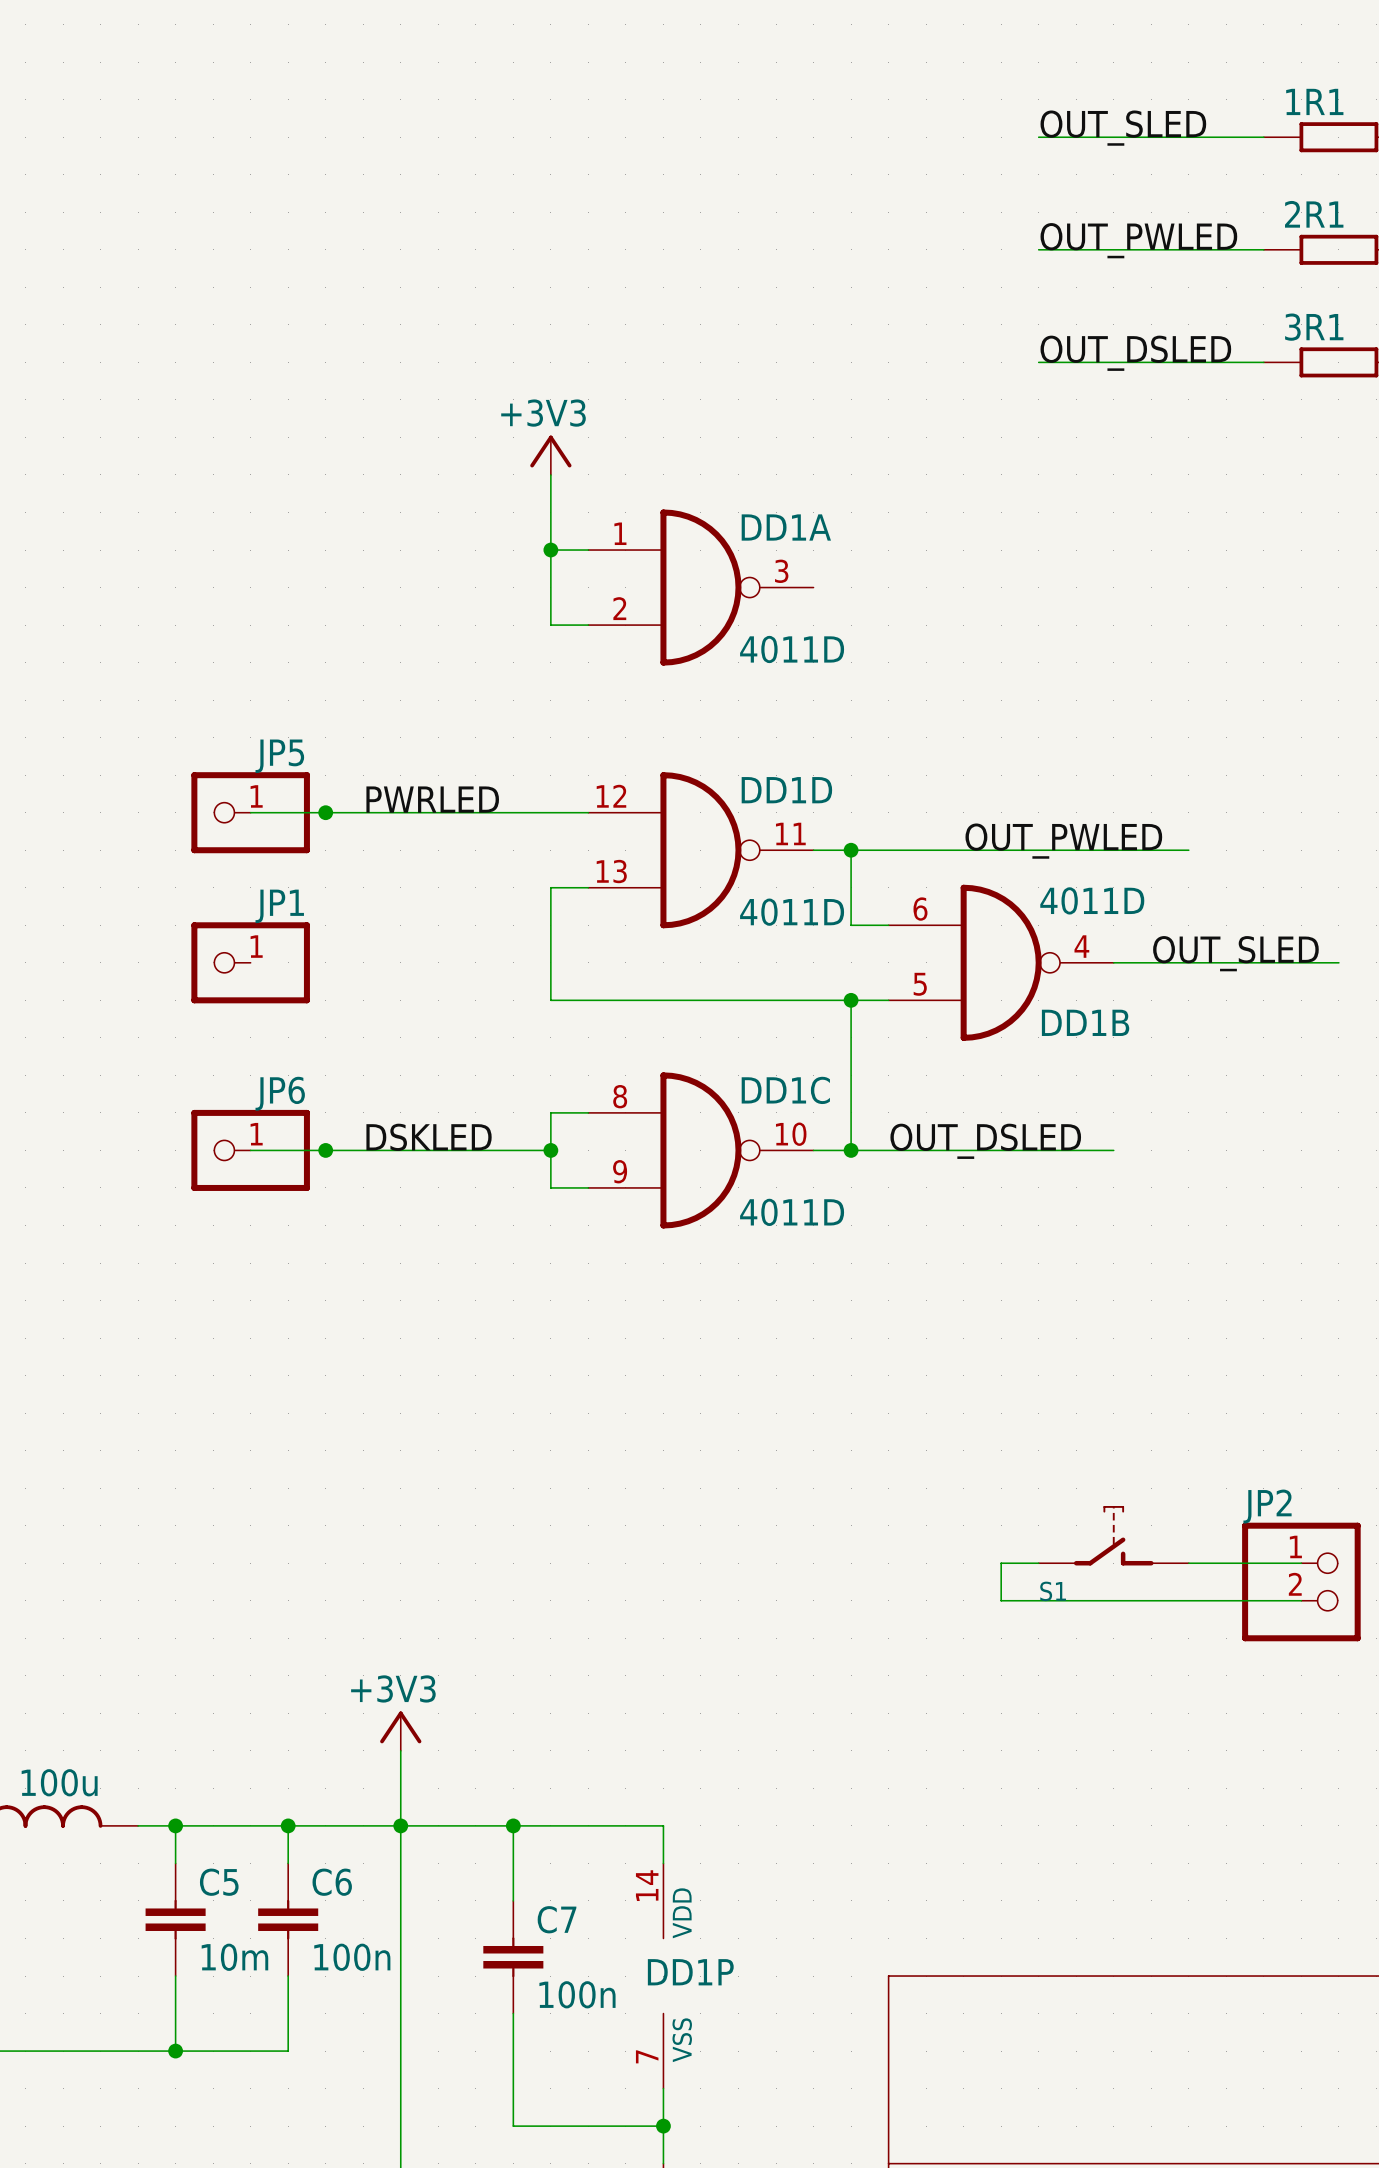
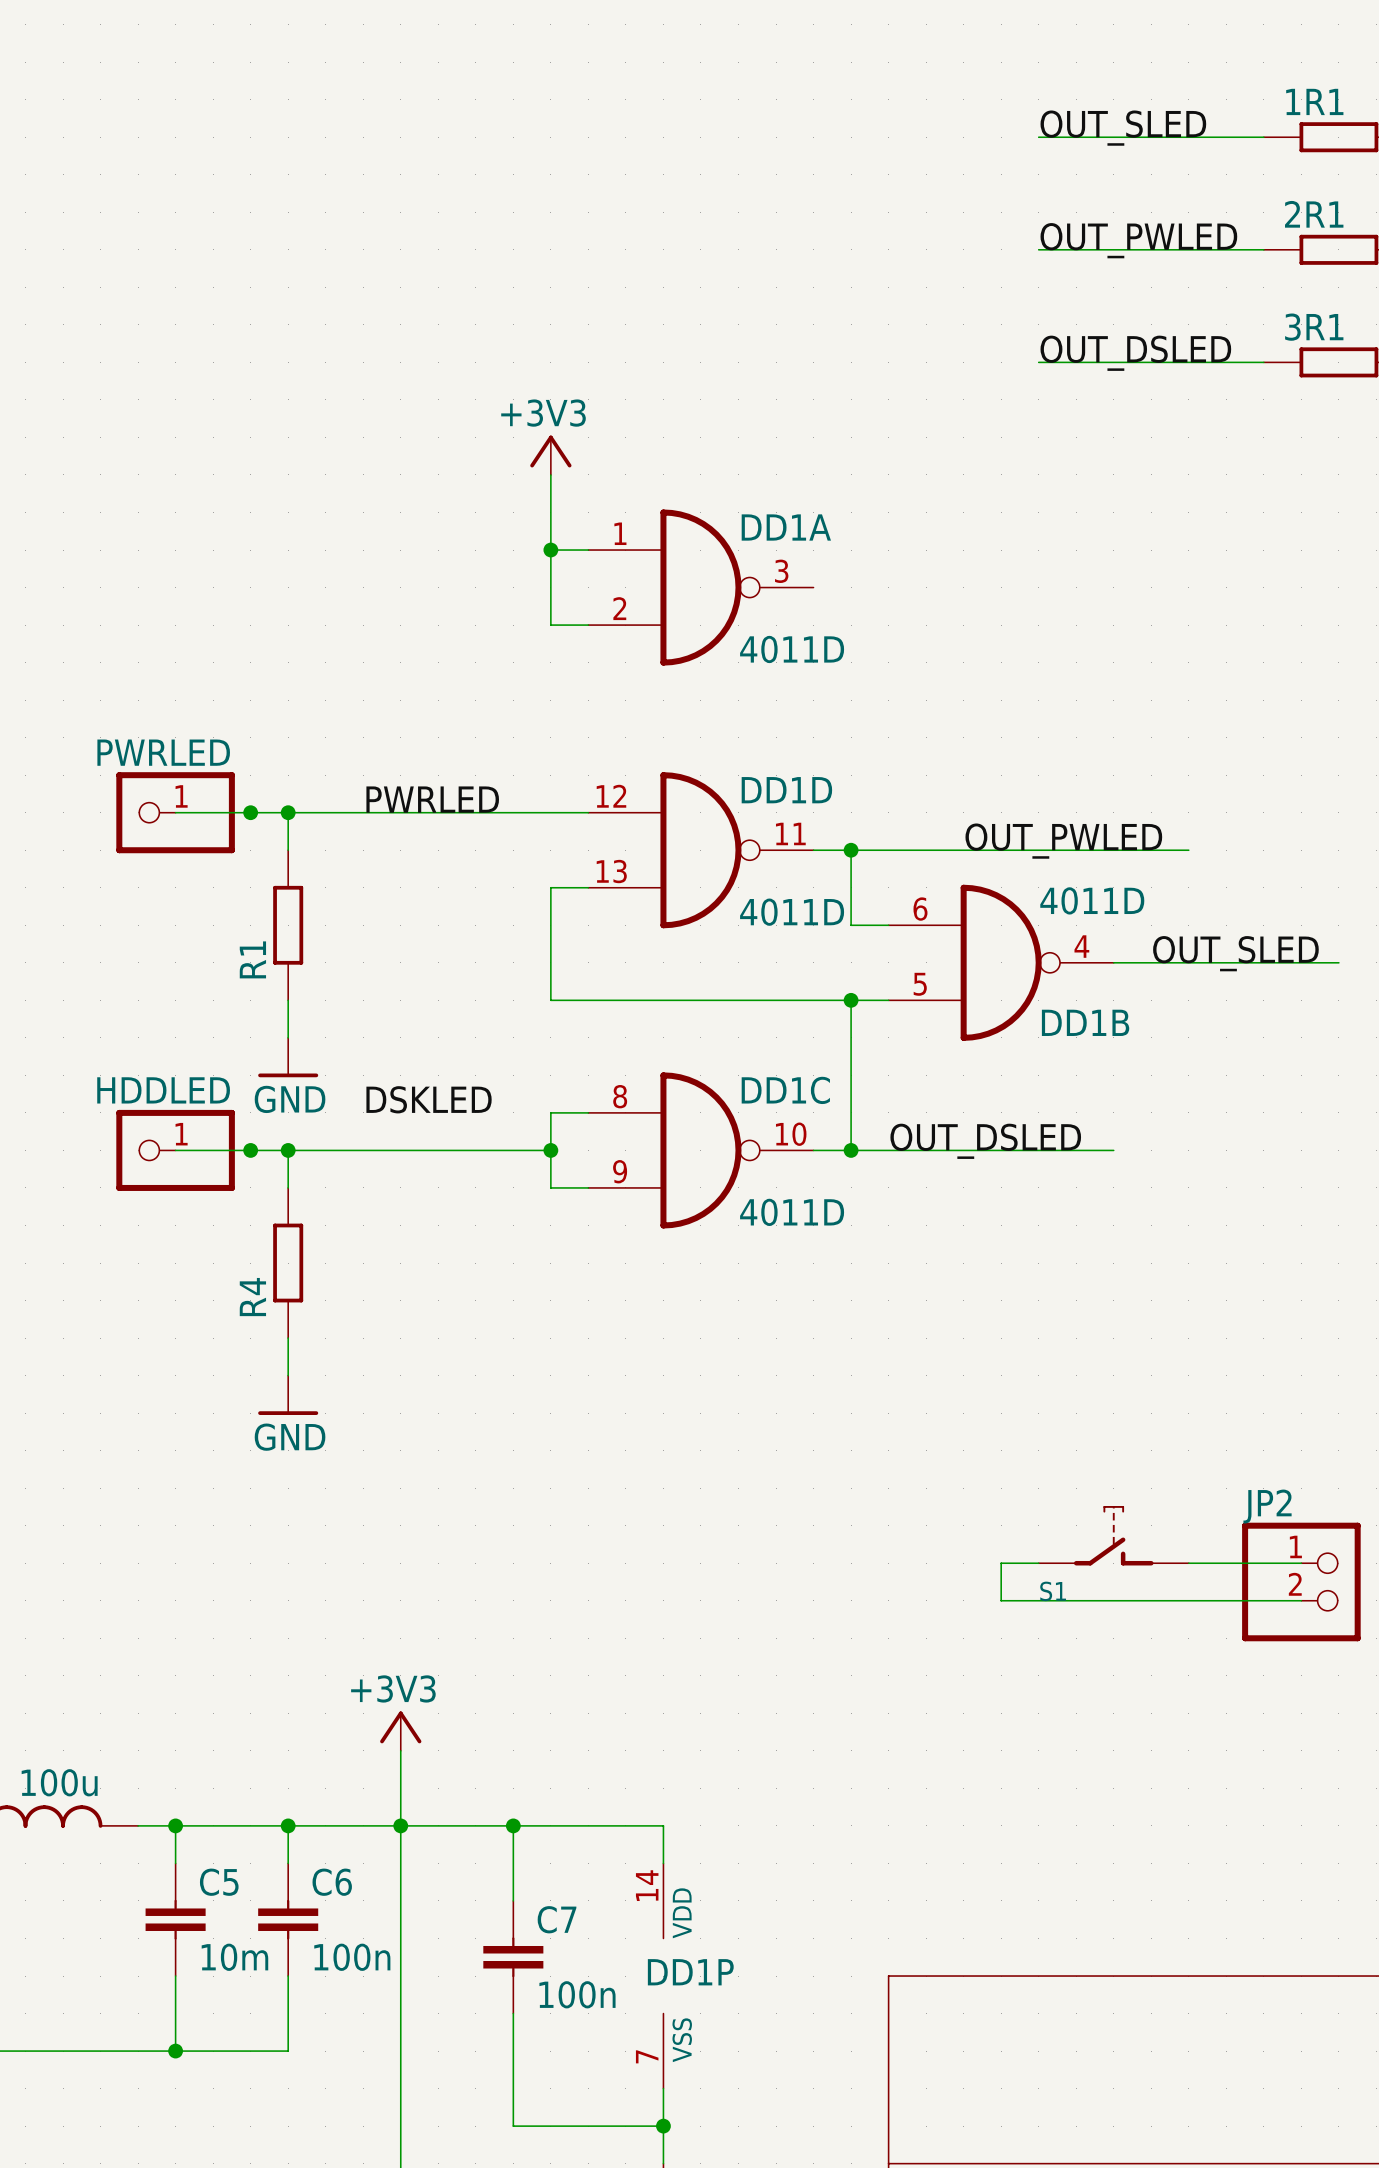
wire: none -> (175, 812) (250, 812)
PWRLED: none -> (175, 812)
JP5: (250, 812) -> none
junction: none -> (250, 812)
wire: none -> (288, 812) (288, 850)
junction: none -> (288, 812)
junction: (325, 812) -> none
R1: none -> (288, 925)
JP1: (250, 962) -> none
wire: none -> (288, 1000) (288, 1037)
power symbol: none -> GND (288, 1057)
label position: DSKLED (429, 1137) -> DSKLED (429, 1099)
wire: none -> (175, 1150) (250, 1150)
HDDLED: none -> (175, 1150)
JP6: (250, 1150) -> none
junction: none -> (250, 1150)
wire: none -> (288, 1150) (288, 1187)
junction: none -> (288, 1150)
junction: (325, 1150) -> none
R4: none -> (288, 1263)
wire: none -> (288, 1338) (288, 1375)
power symbol: none -> GND (288, 1395)

